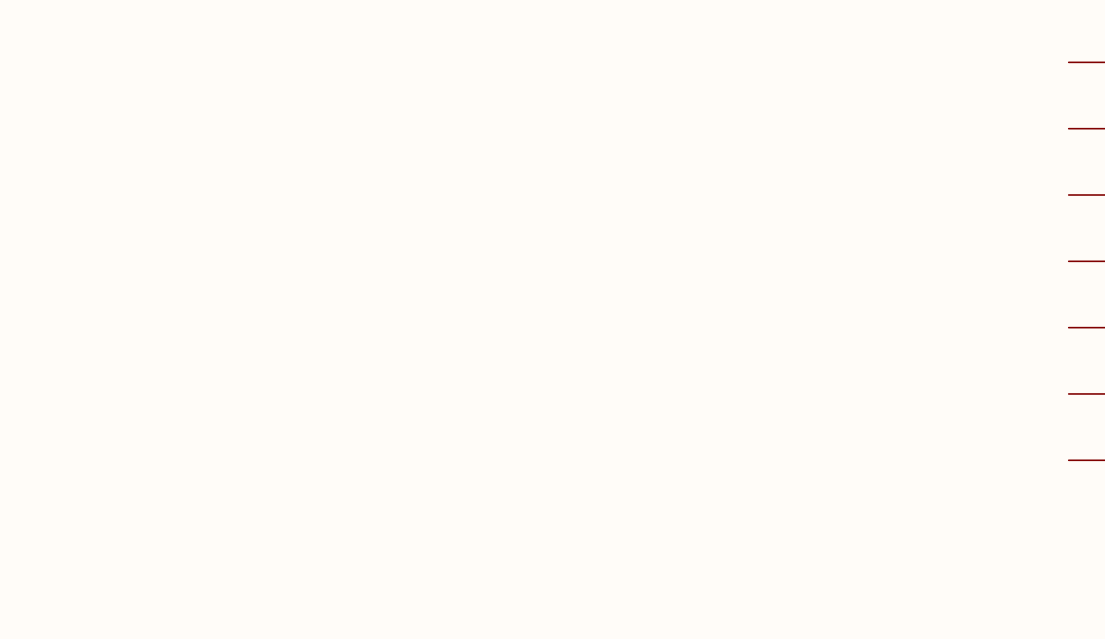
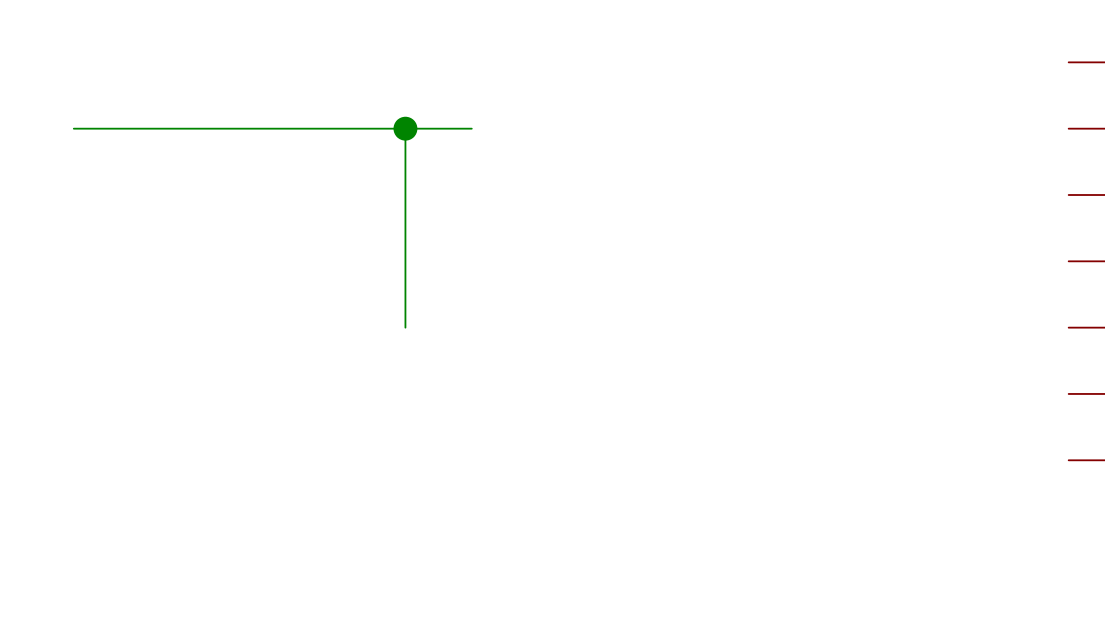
wire: none -> (73, 128) (471, 128)
wire: none -> (405, 128) (405, 327)
junction: none -> (405, 128)

